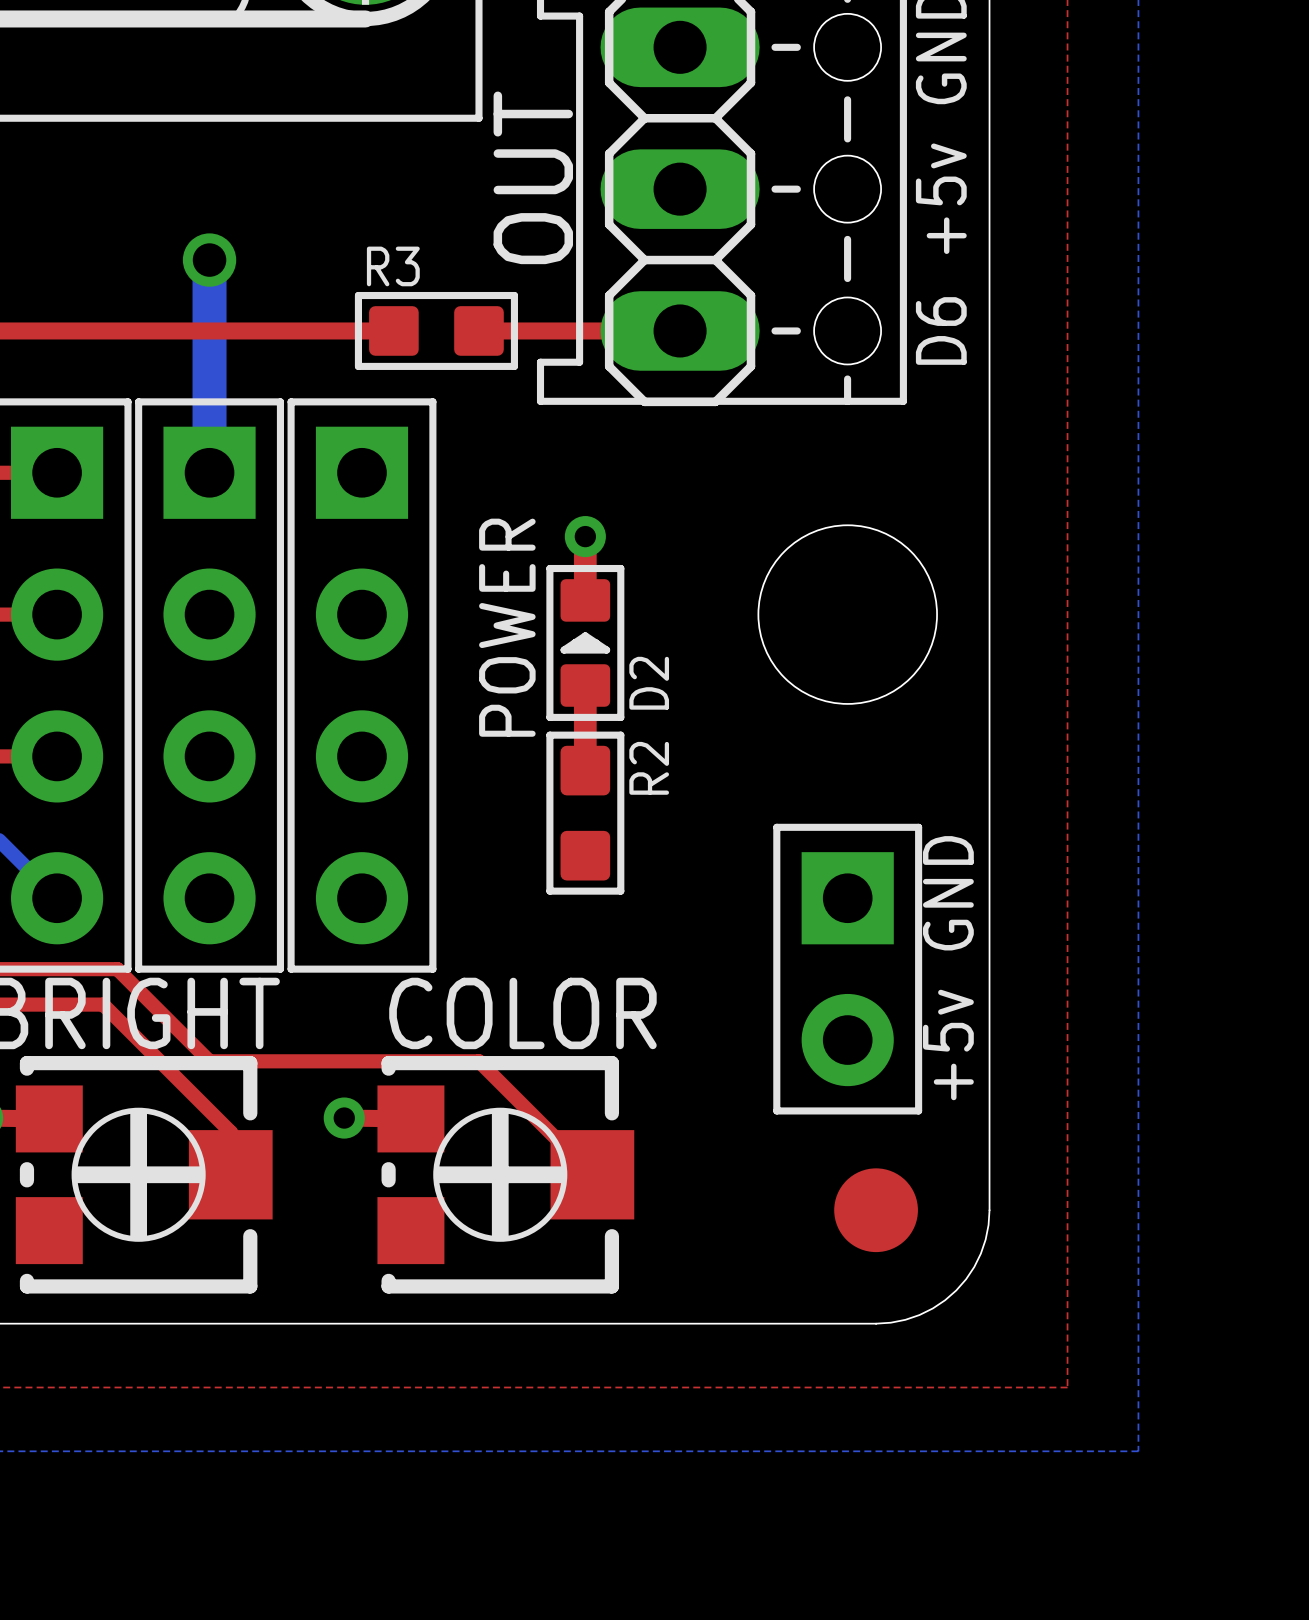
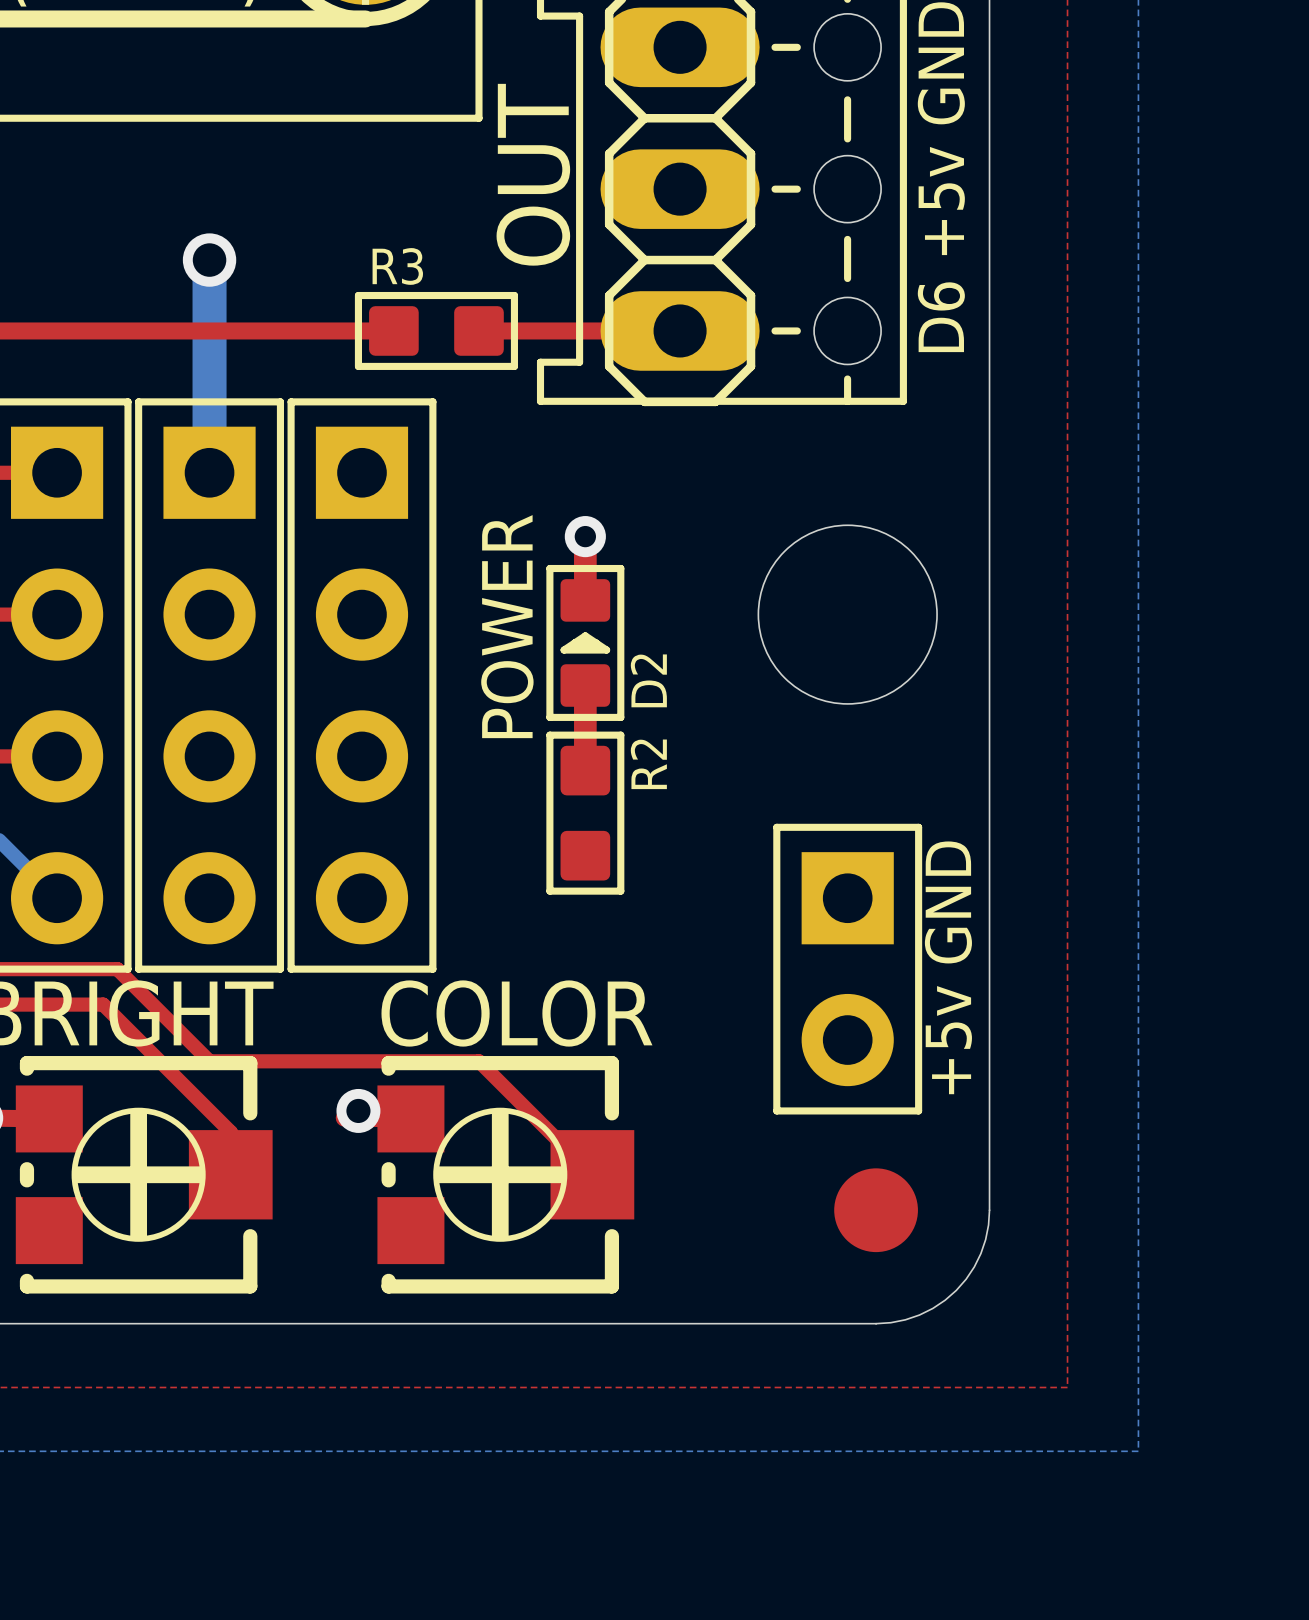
via position: (344, 1118) -> (358, 1110)

